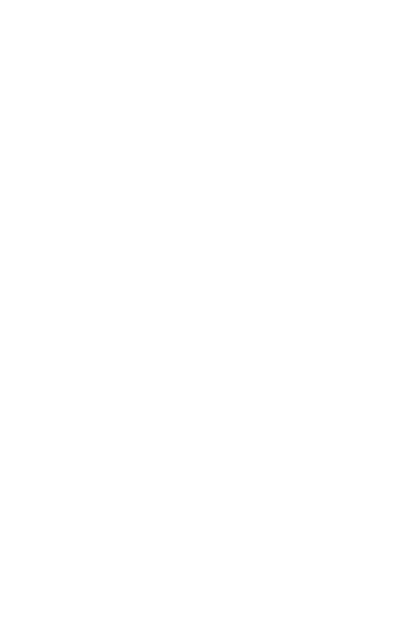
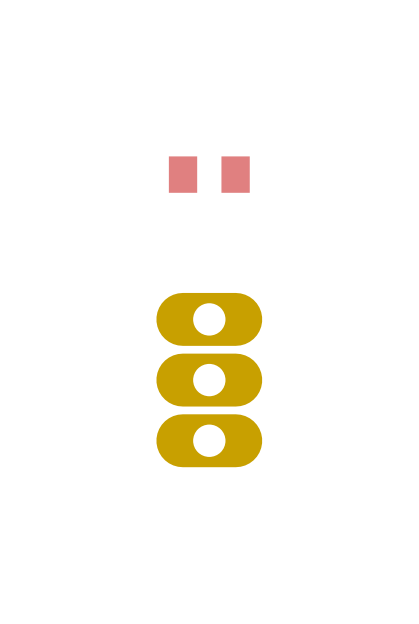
part: none -> (209, 174)
part: none -> (209, 380)

